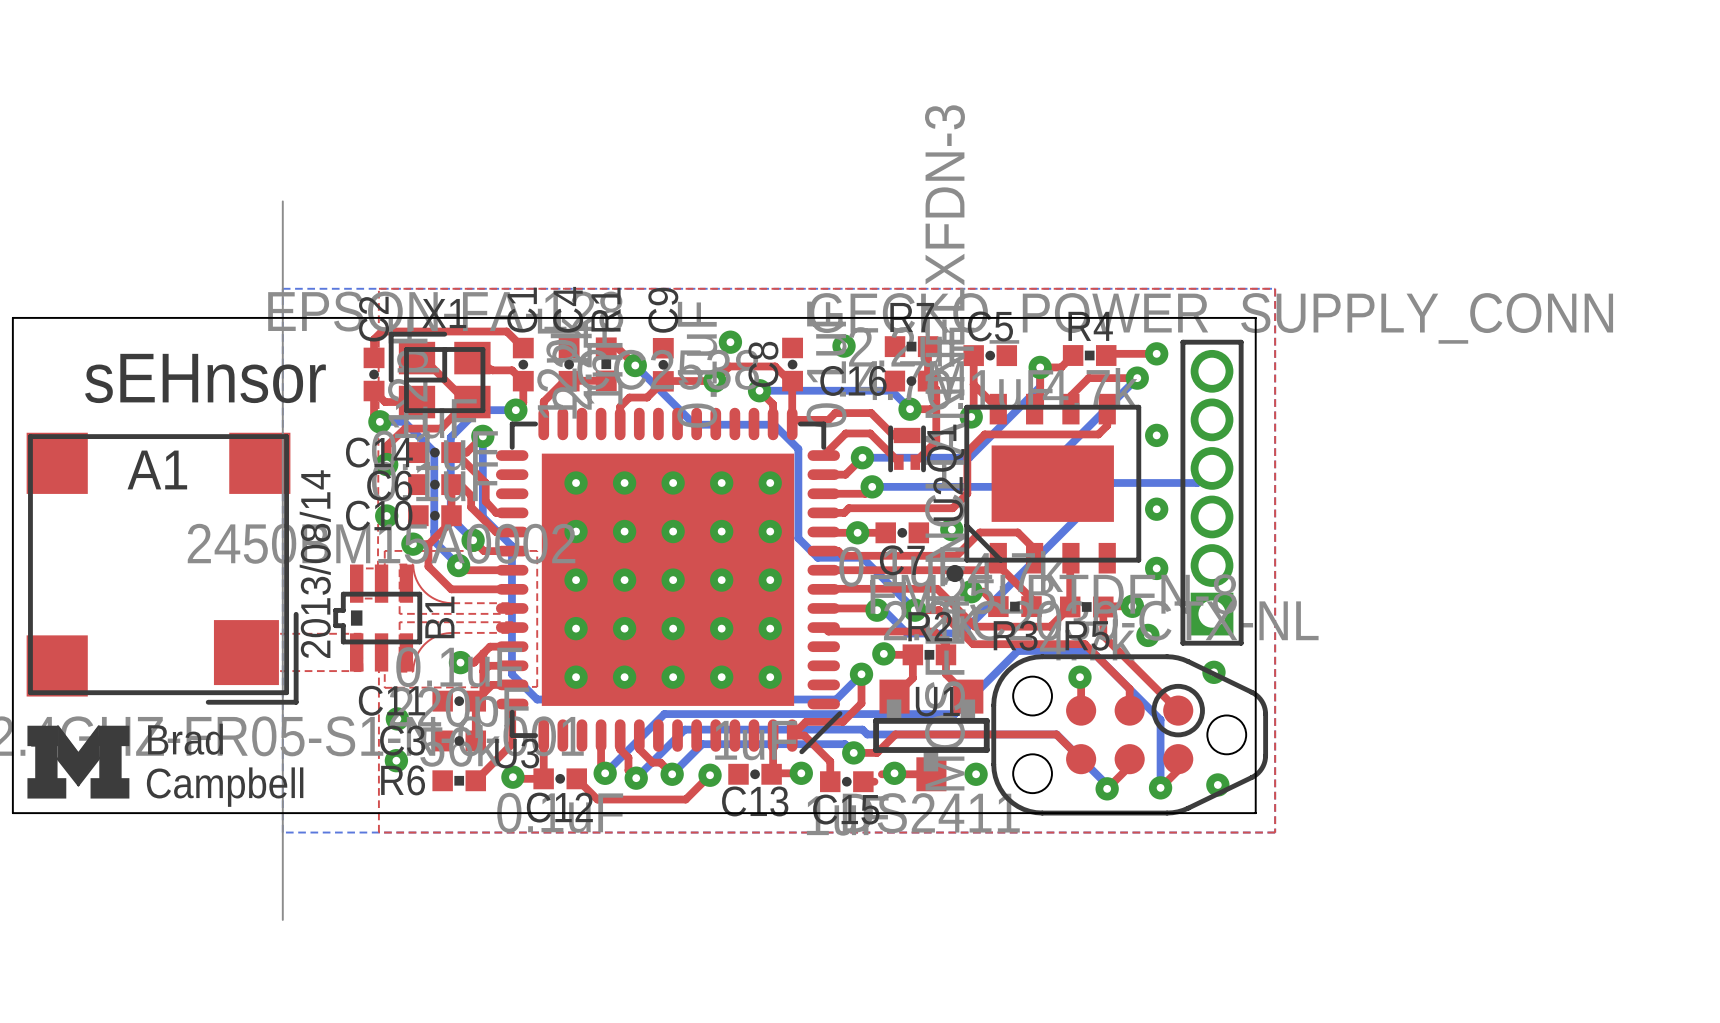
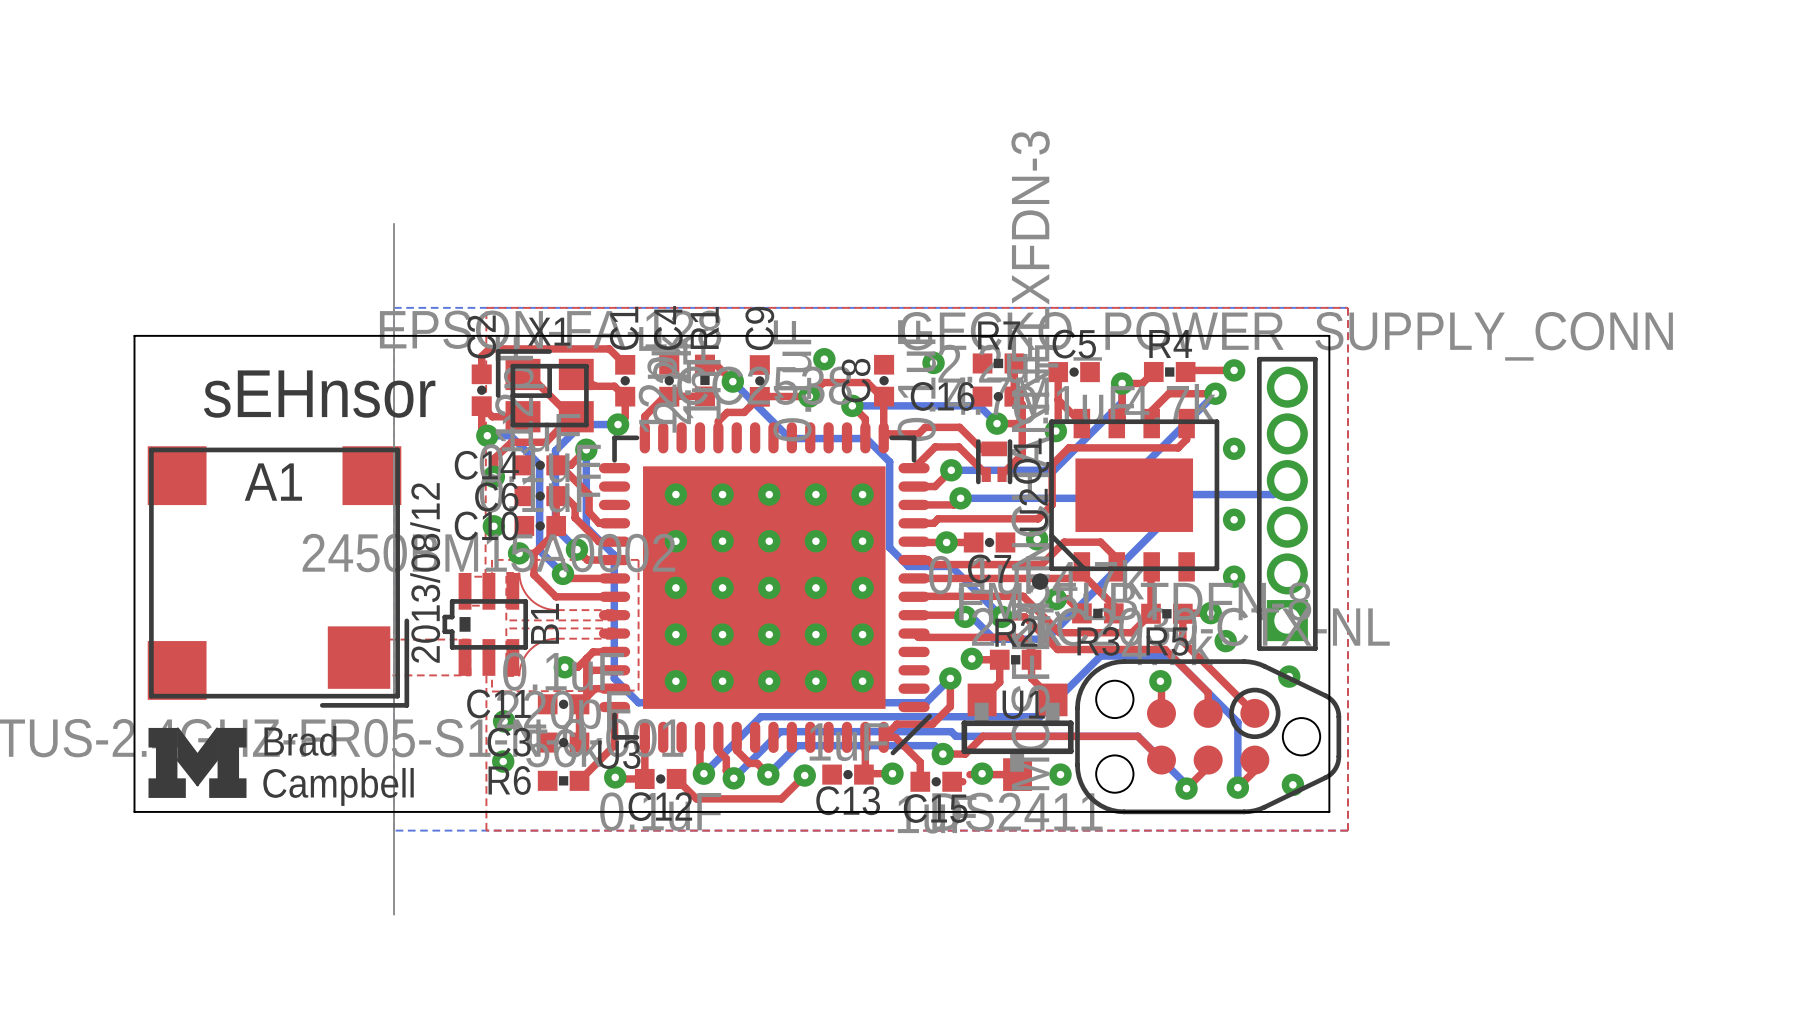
text: 2013/08/14 (315, 564) -> 2013/08/12 (425, 572)

